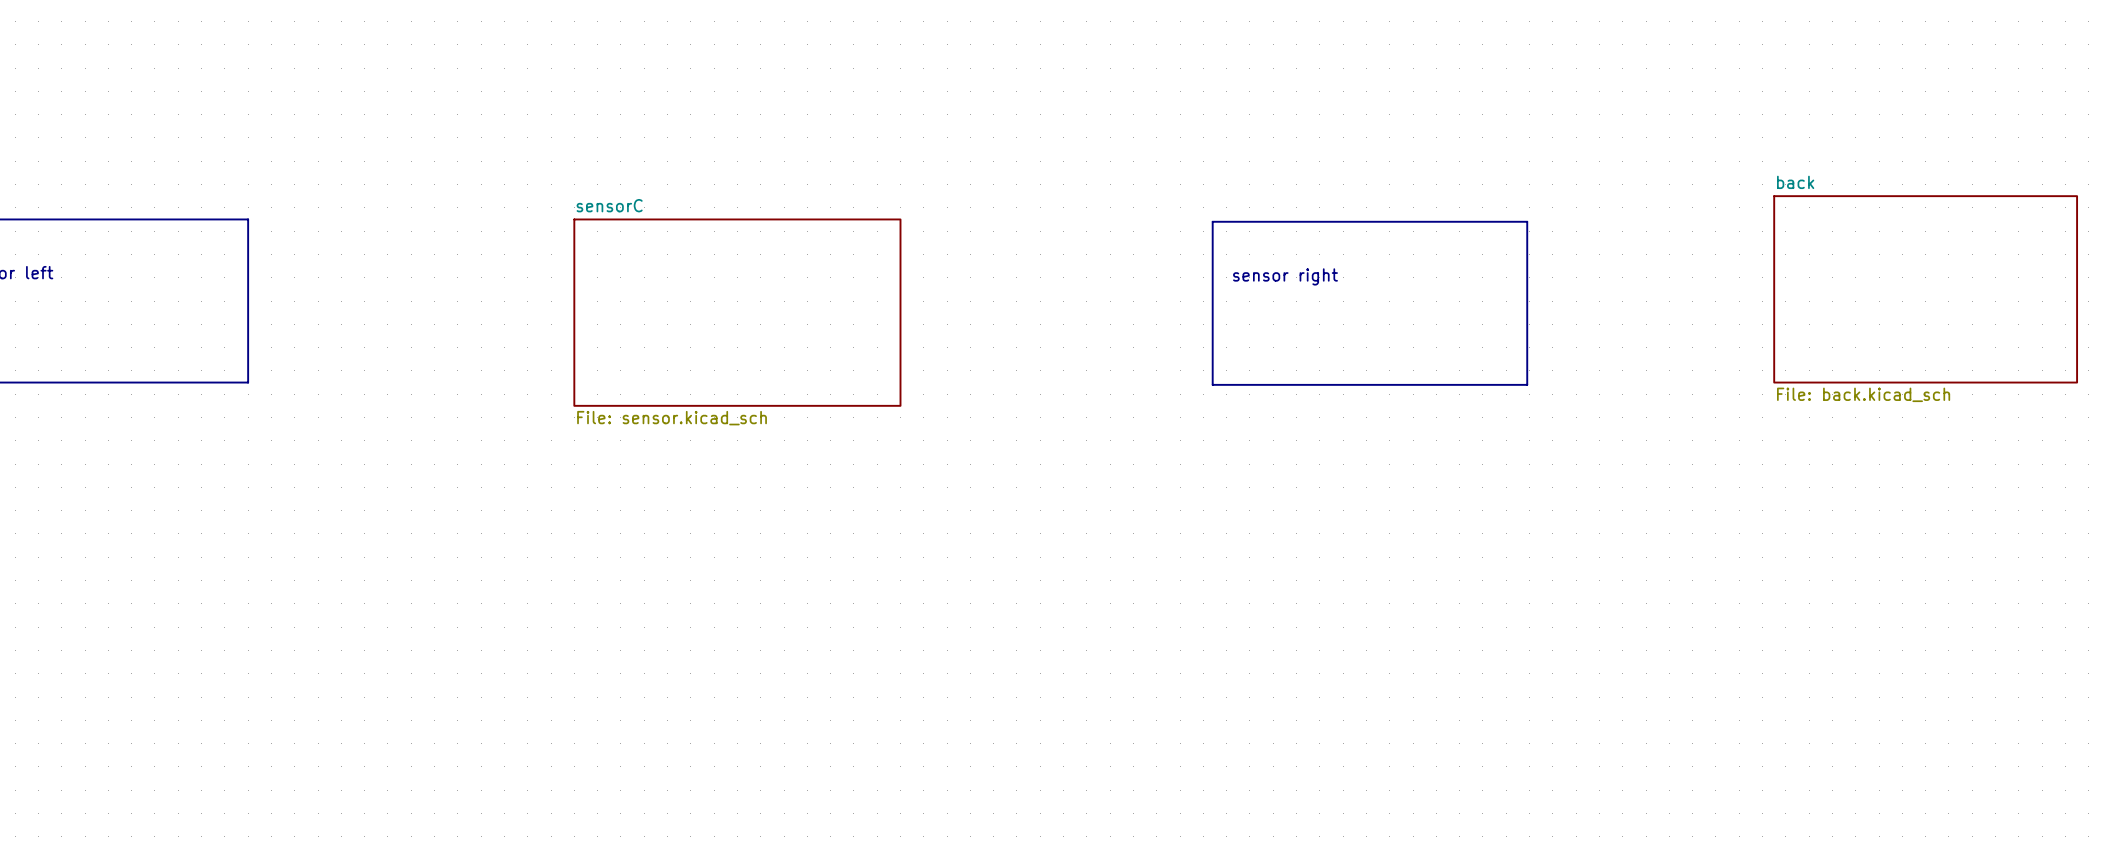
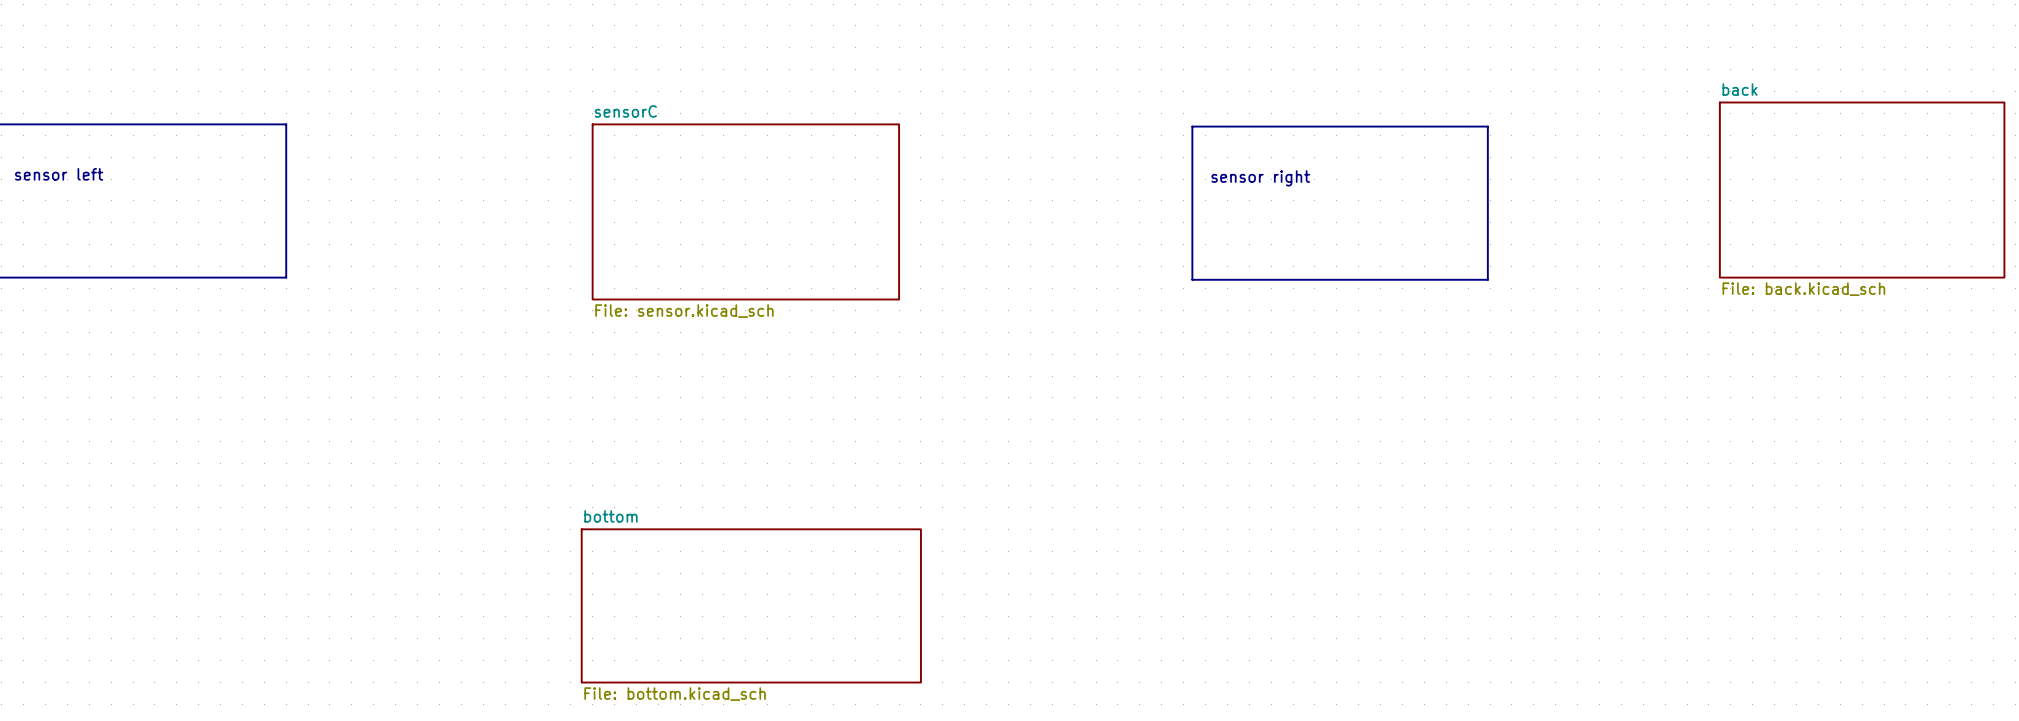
sheet bottom: none -> File: bottom.kicad_sch (751, 605)

